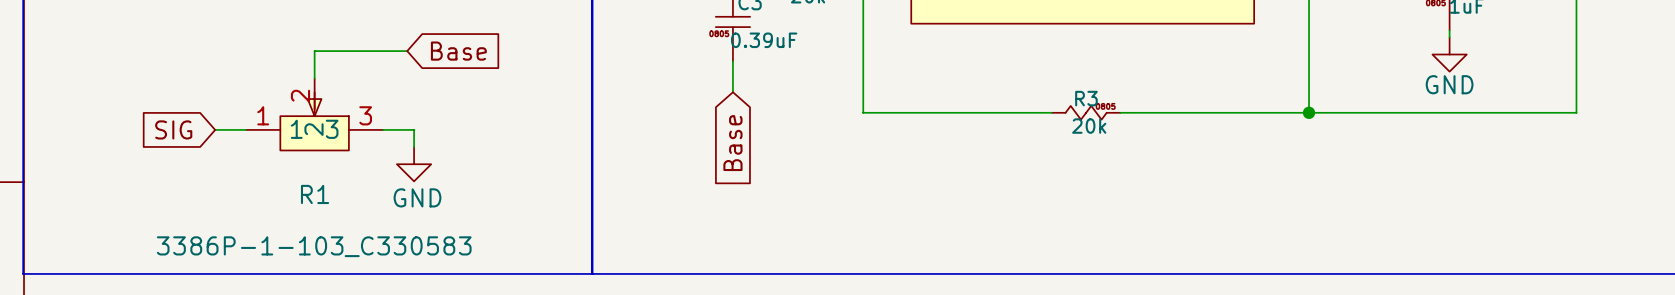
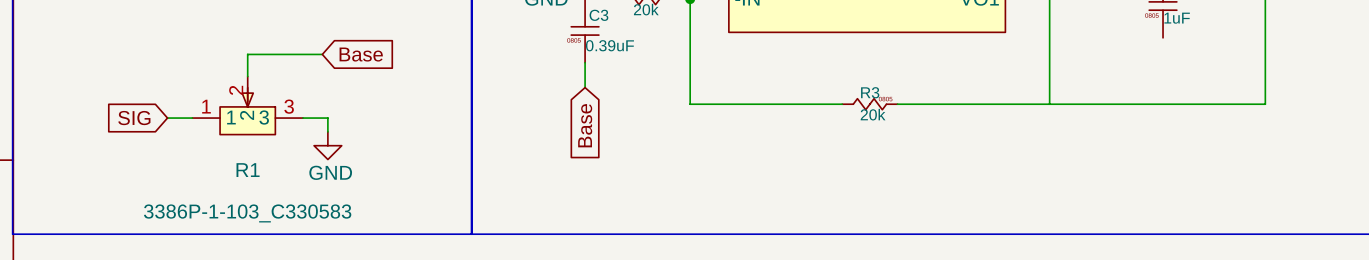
wire: (1449, 30) (1449, 37) -> none
power symbol: GND (1449, 54) -> none
junction: (1309, 112) -> none

